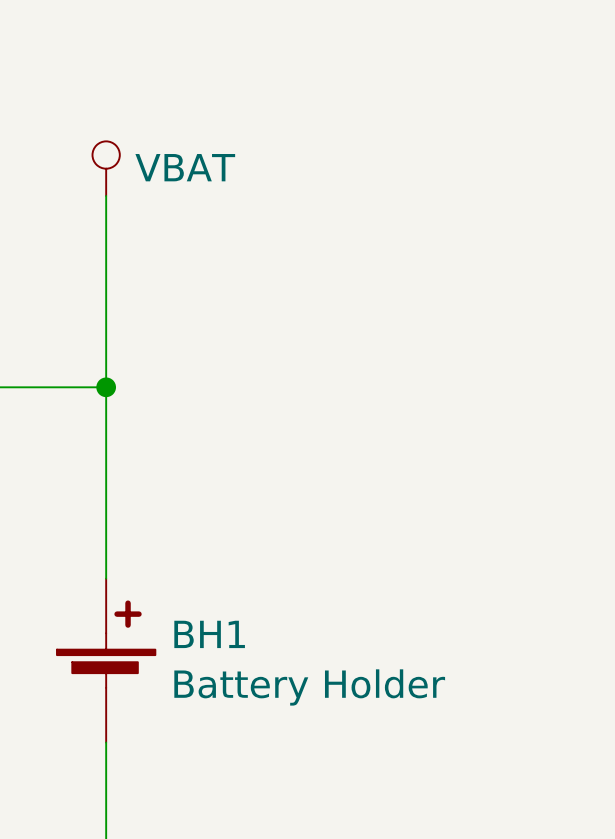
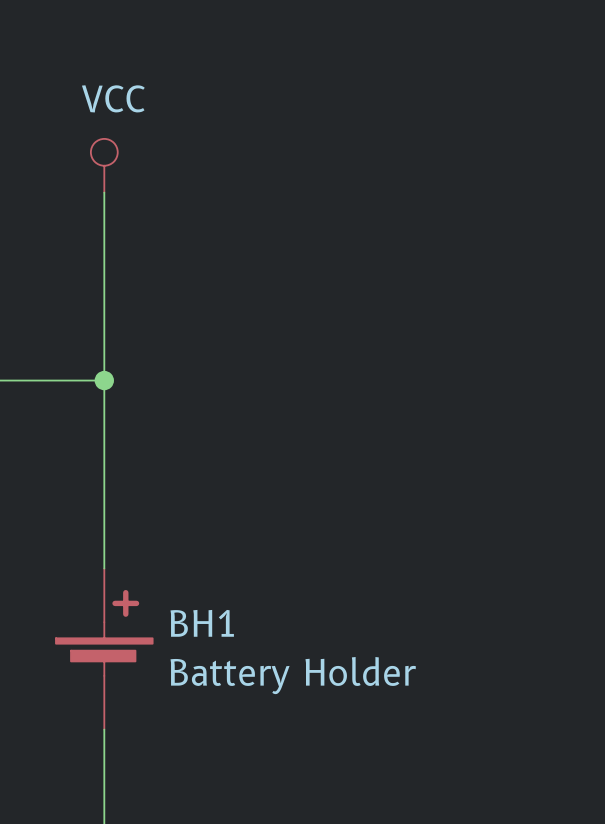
part: VBAT (106, 168) -> none
power symbol: none -> VCC (104, 165)

